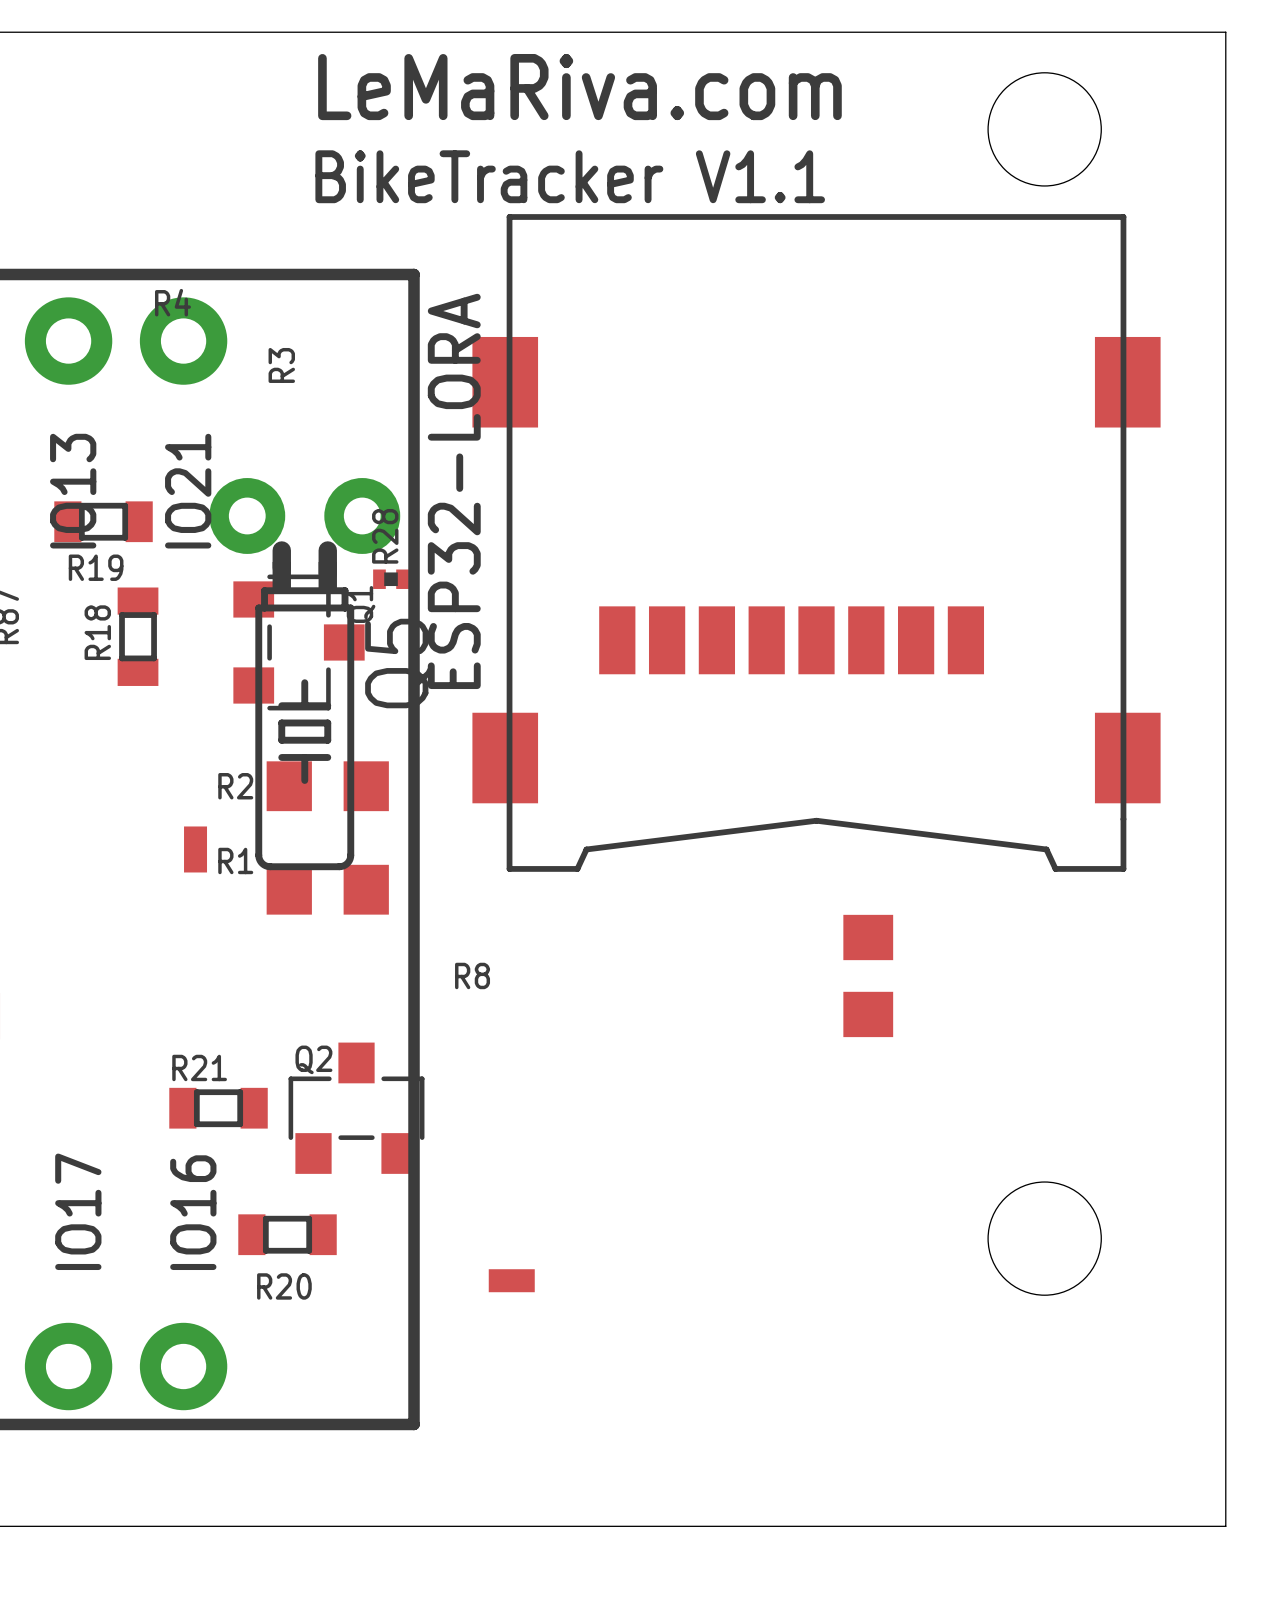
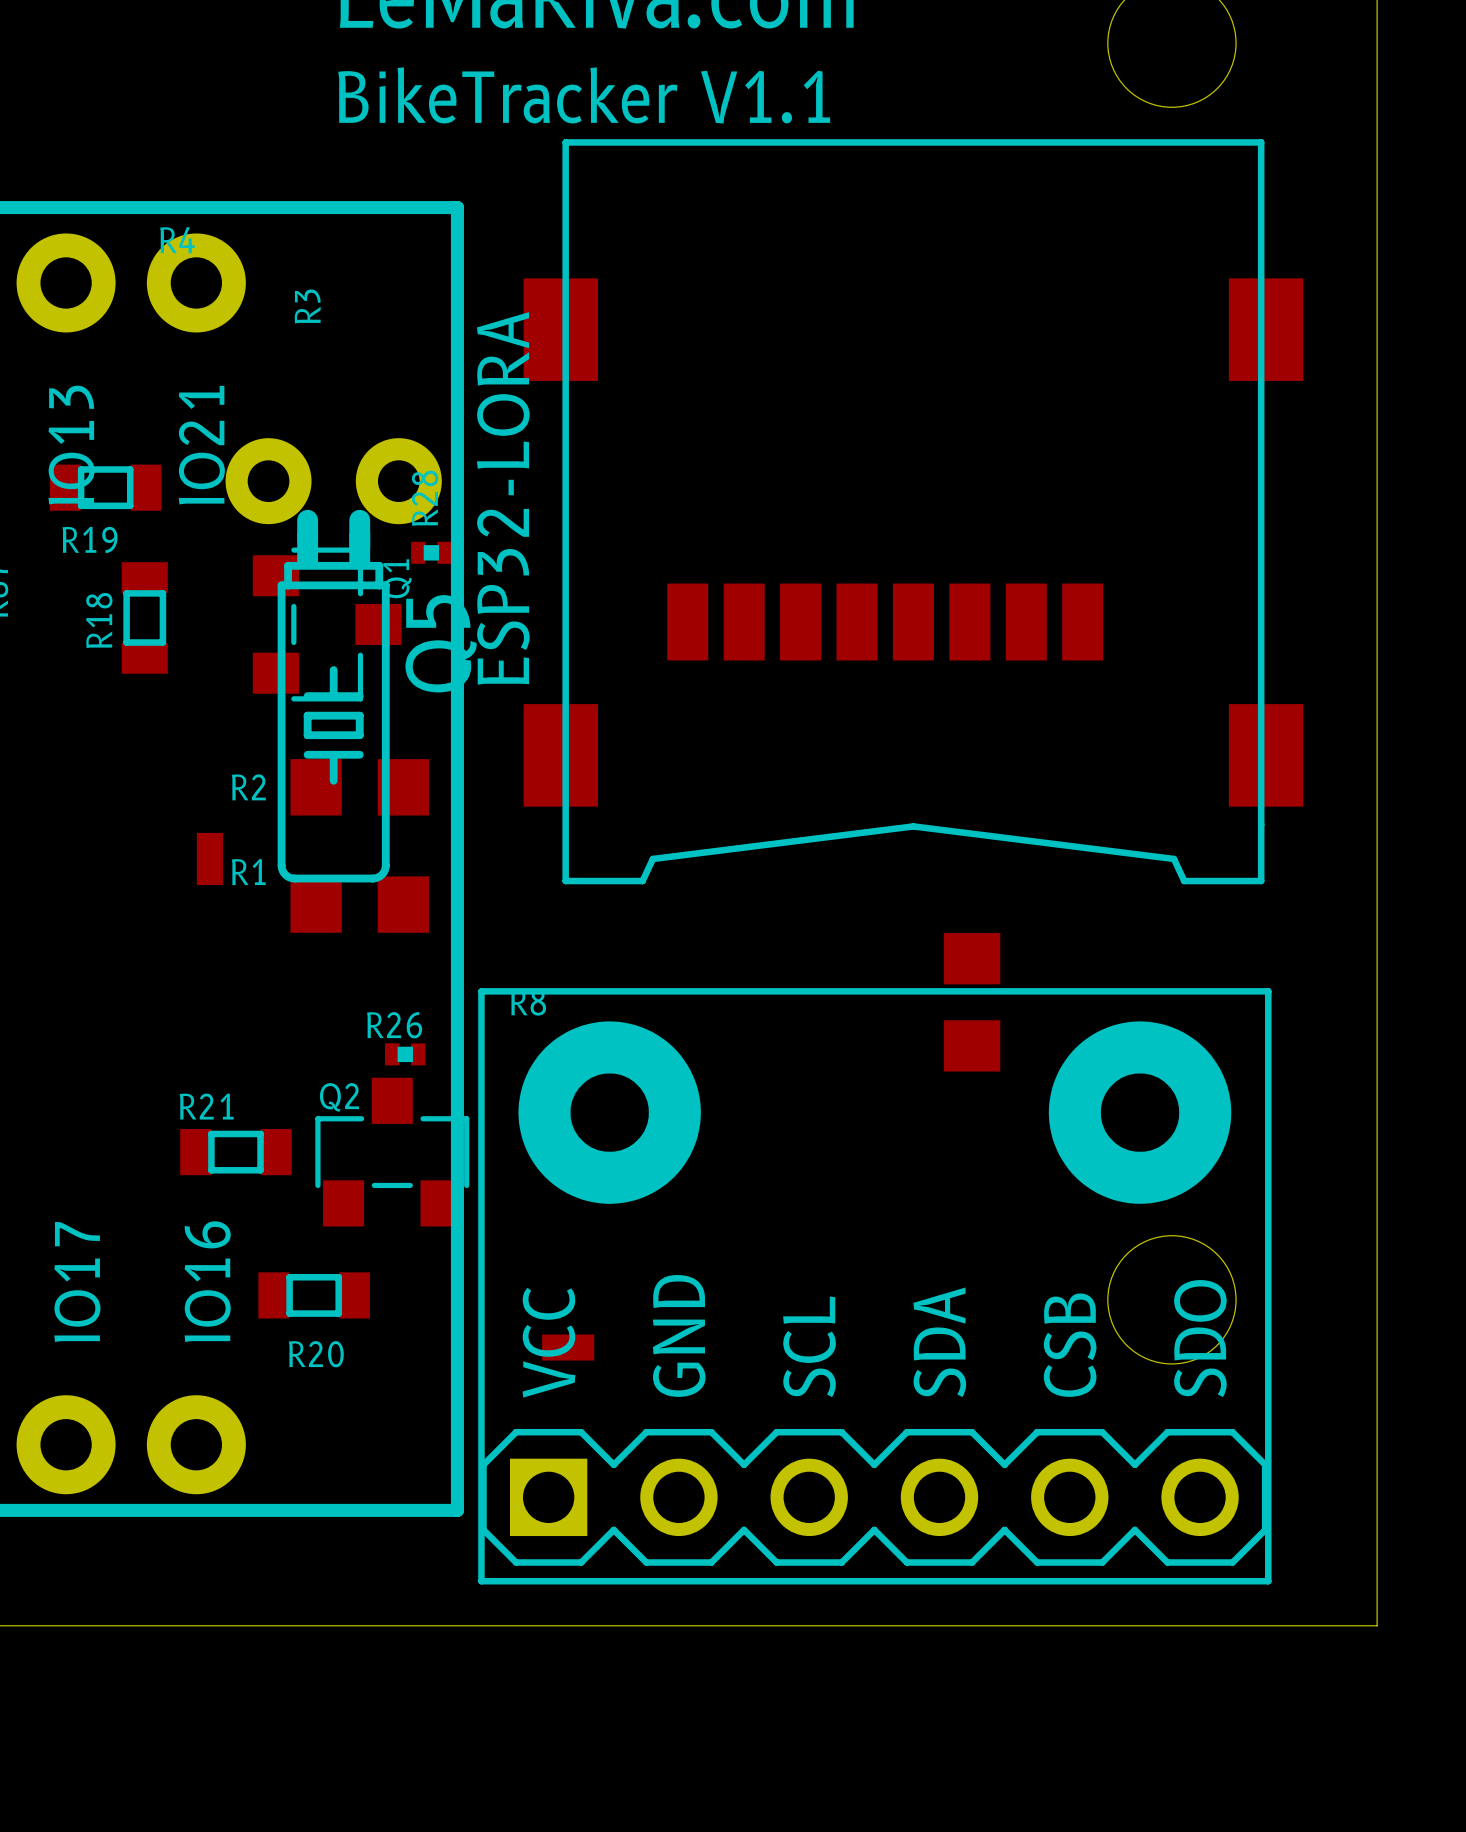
R26: none -> (405, 1054)
part: none -> (874, 1286)

